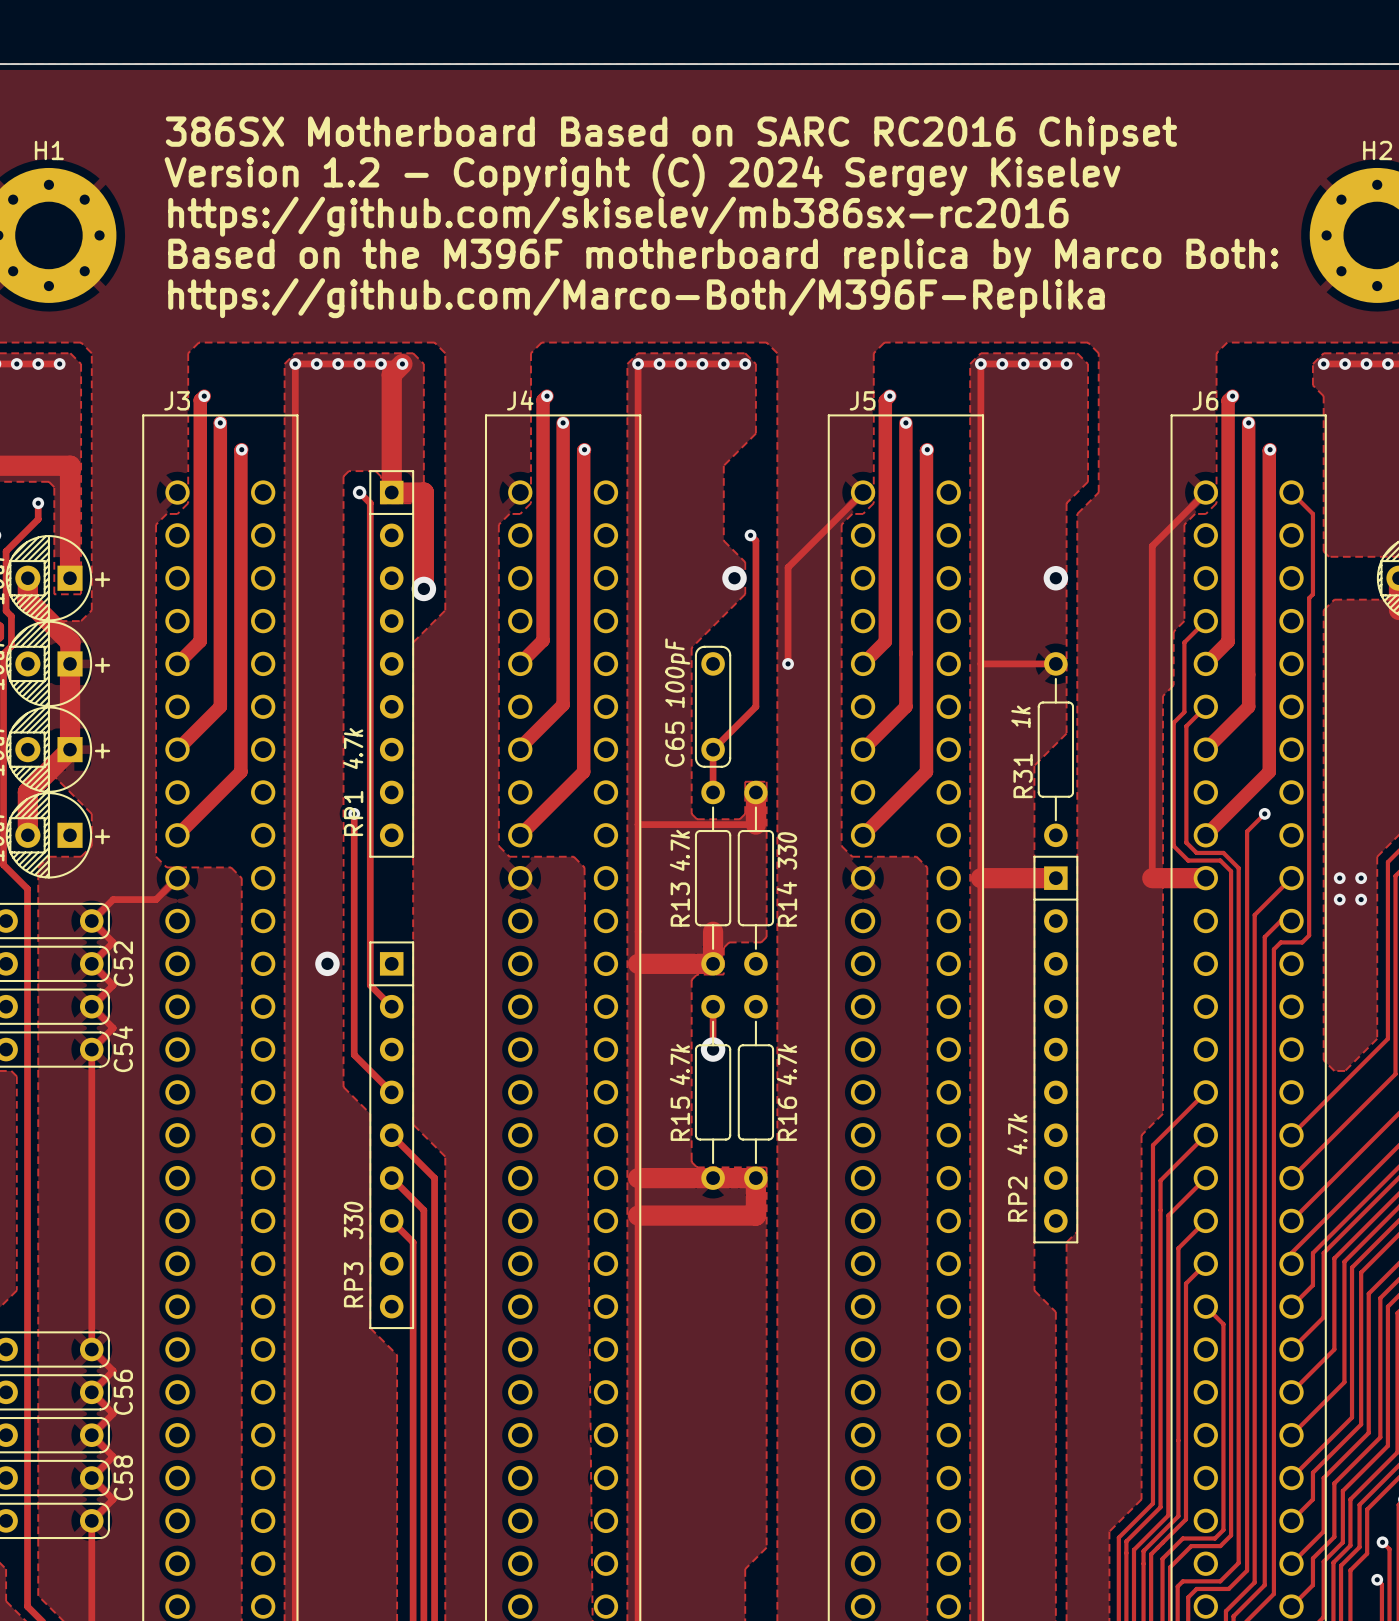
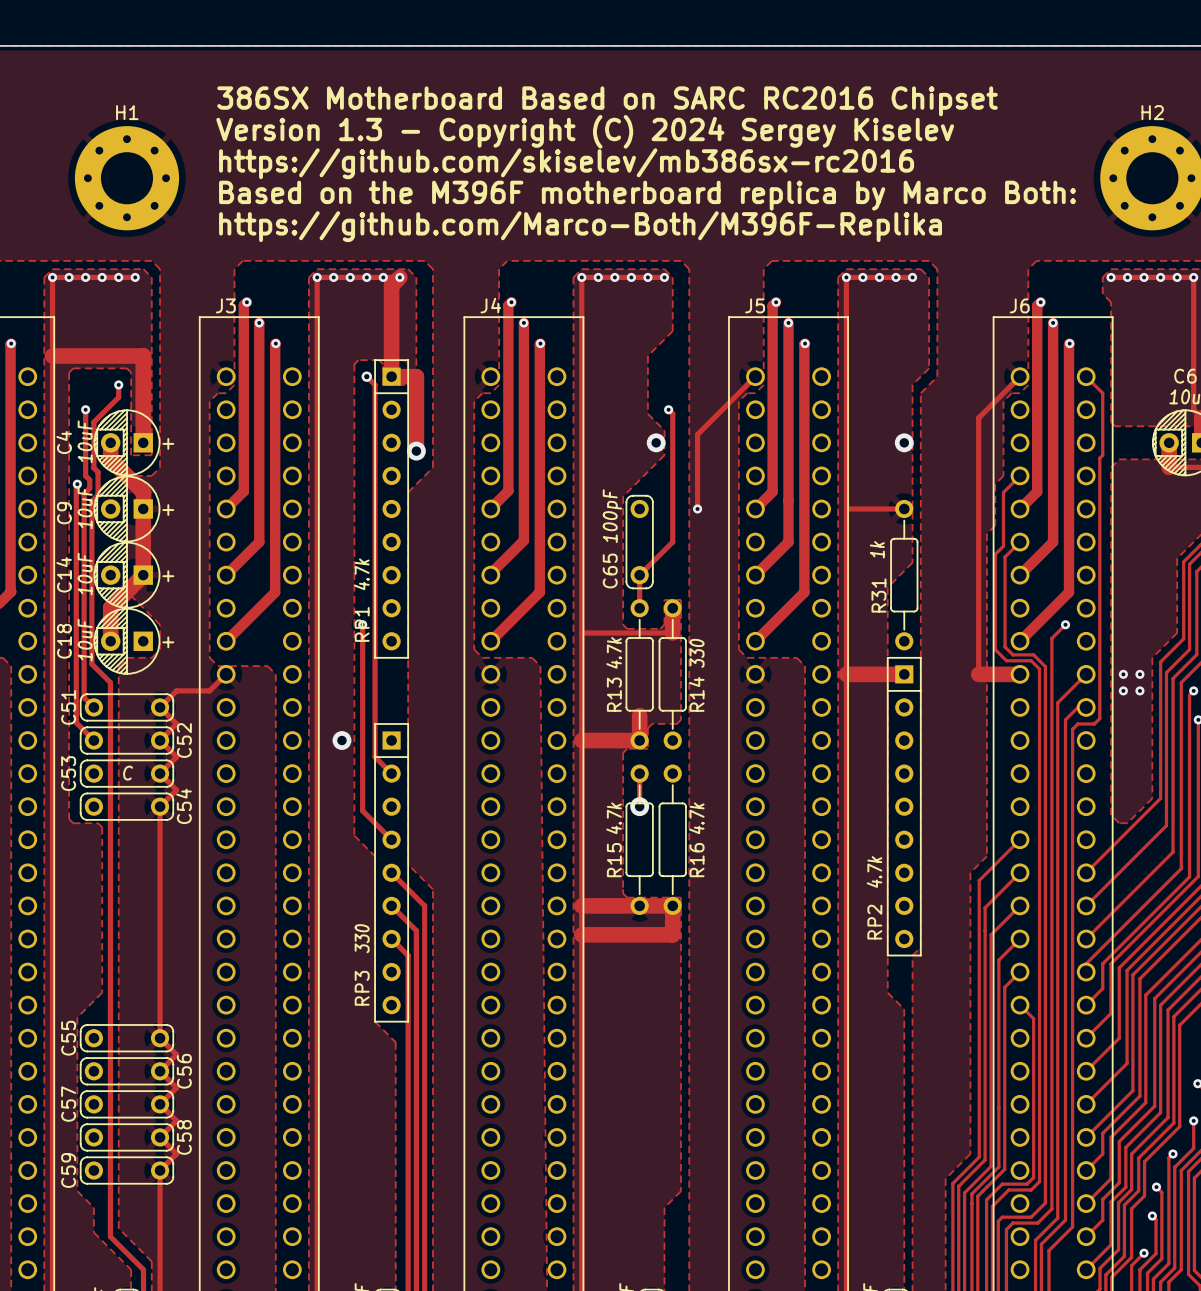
text: Version 1.2 - Copyright (C) 2024 Sergey Kiselev (642, 175) -> Version 1.3 - Copyright (C) 2024 Sergey Kiselev (585, 131)
C53 value: none -> C (128, 773)

